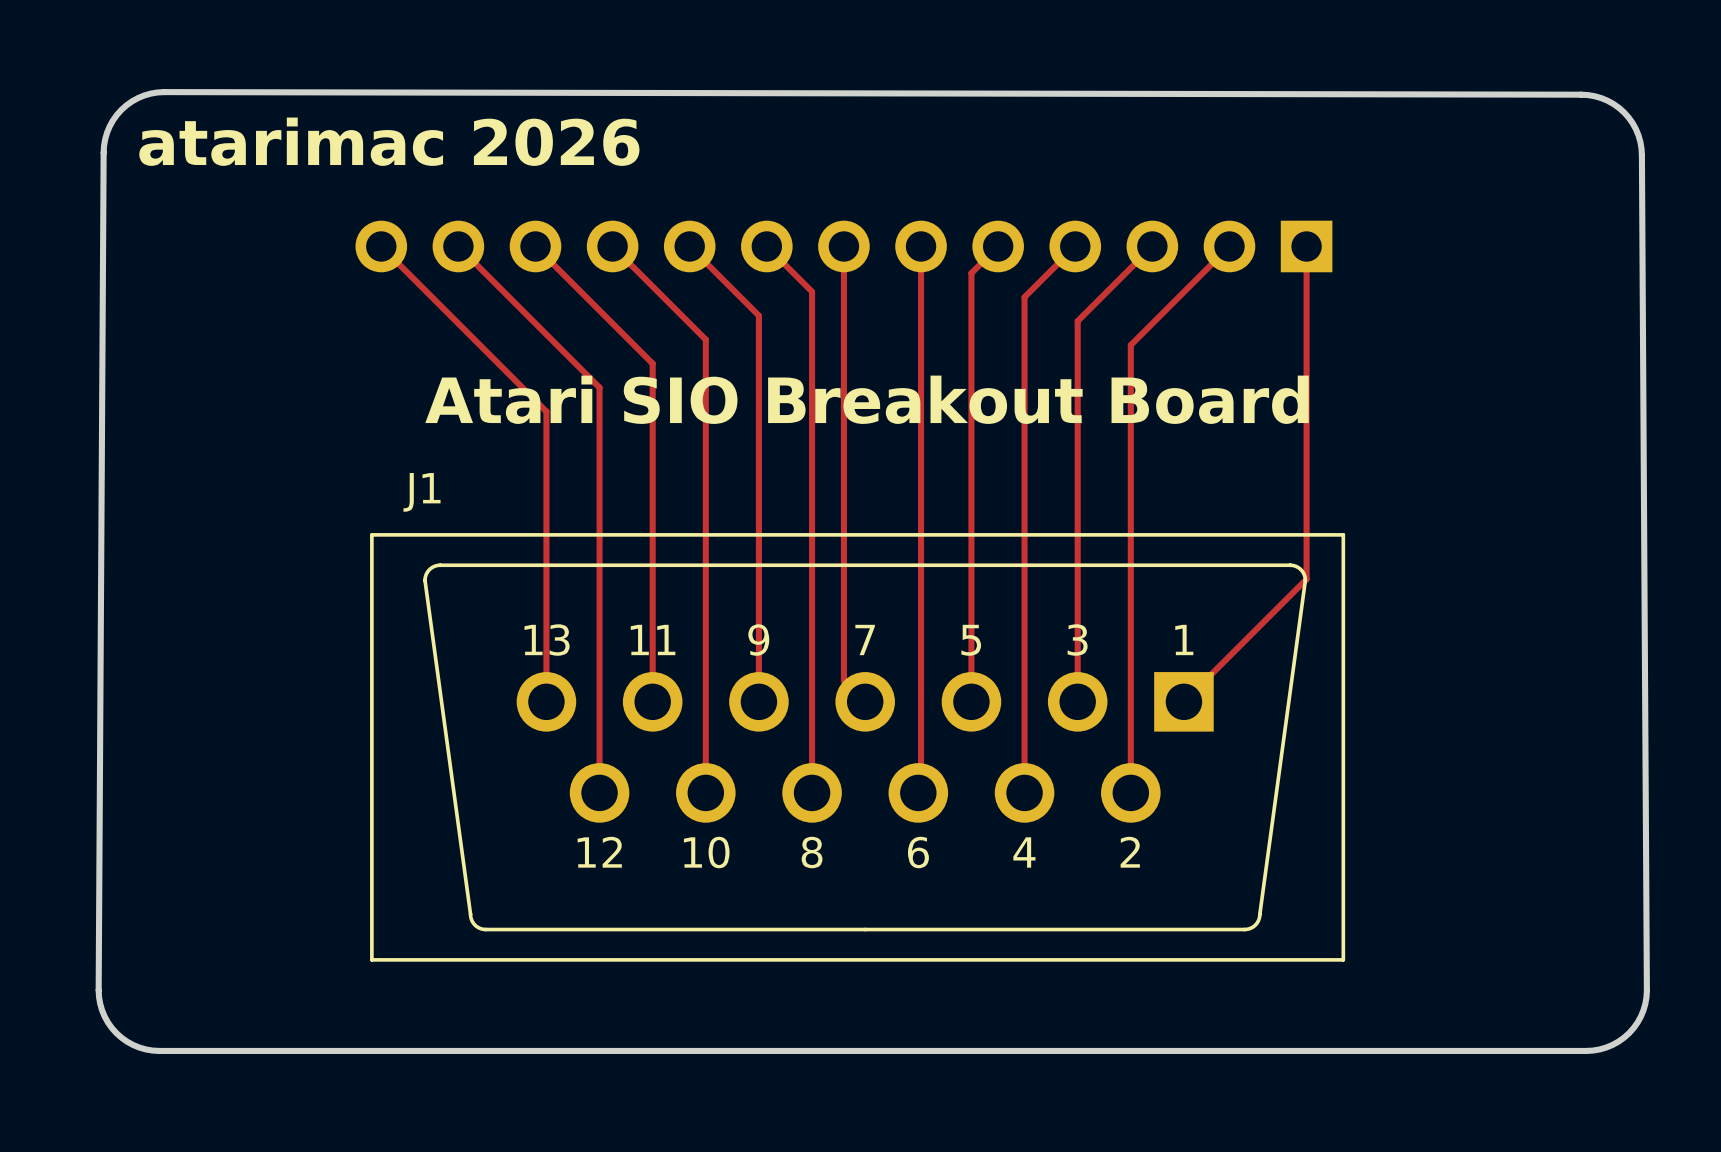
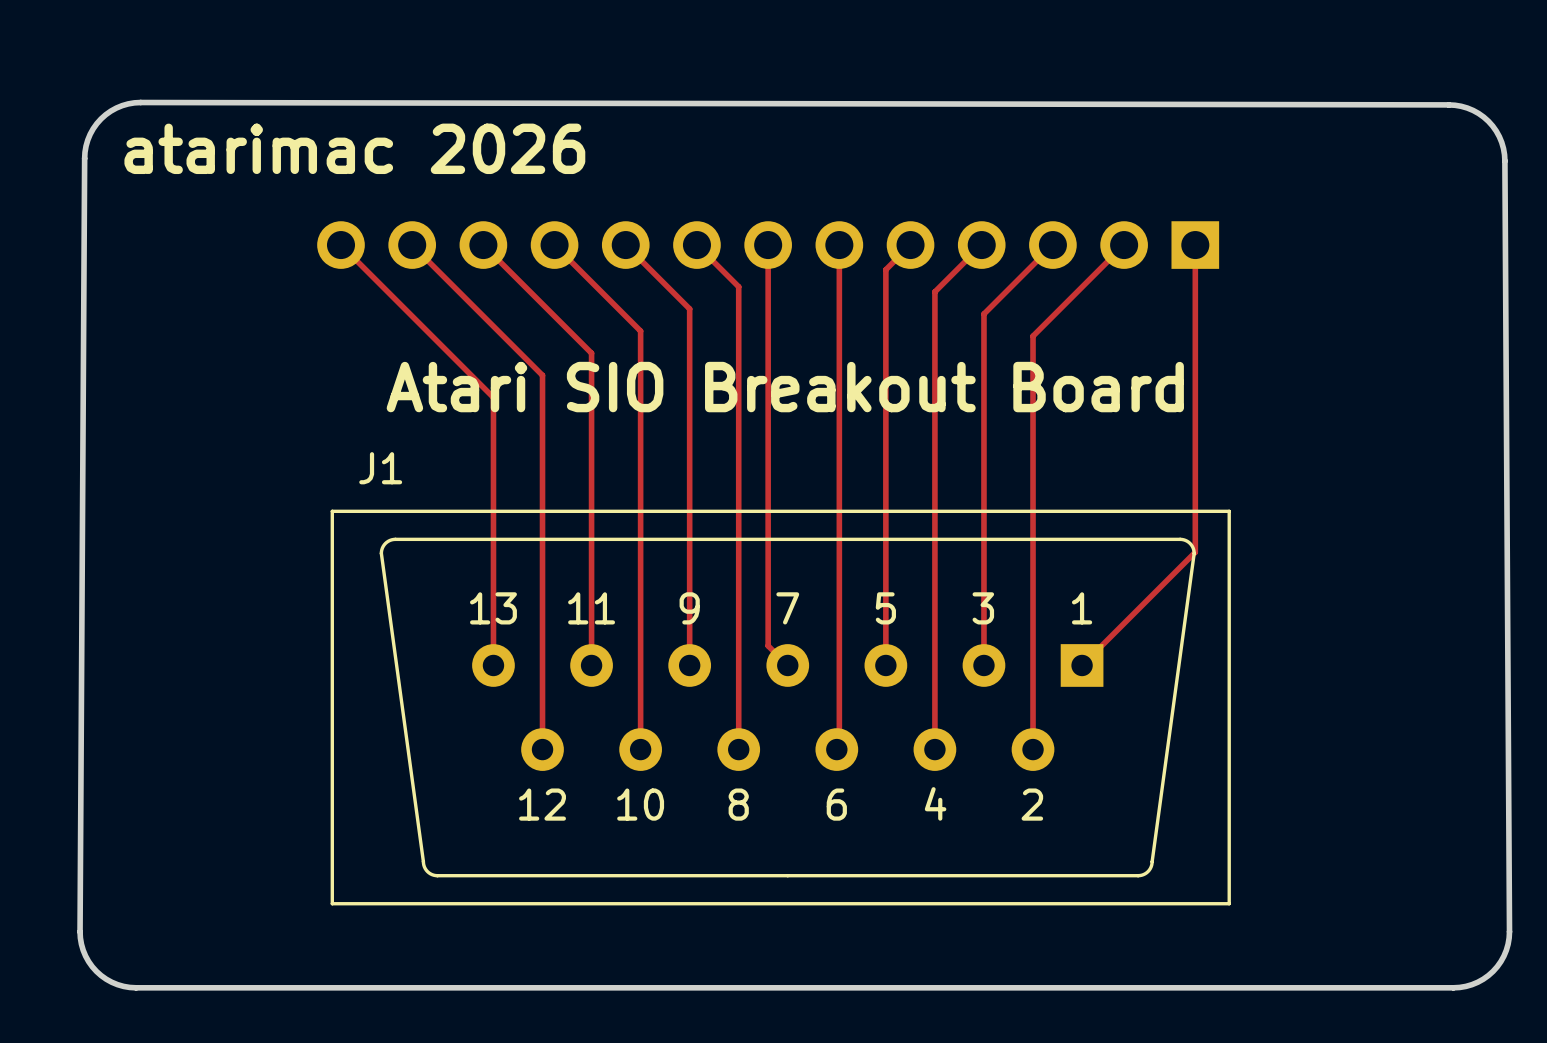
J1 footprint: [370, 533, 1346, 962] -> [330, 509, 1231, 906]

